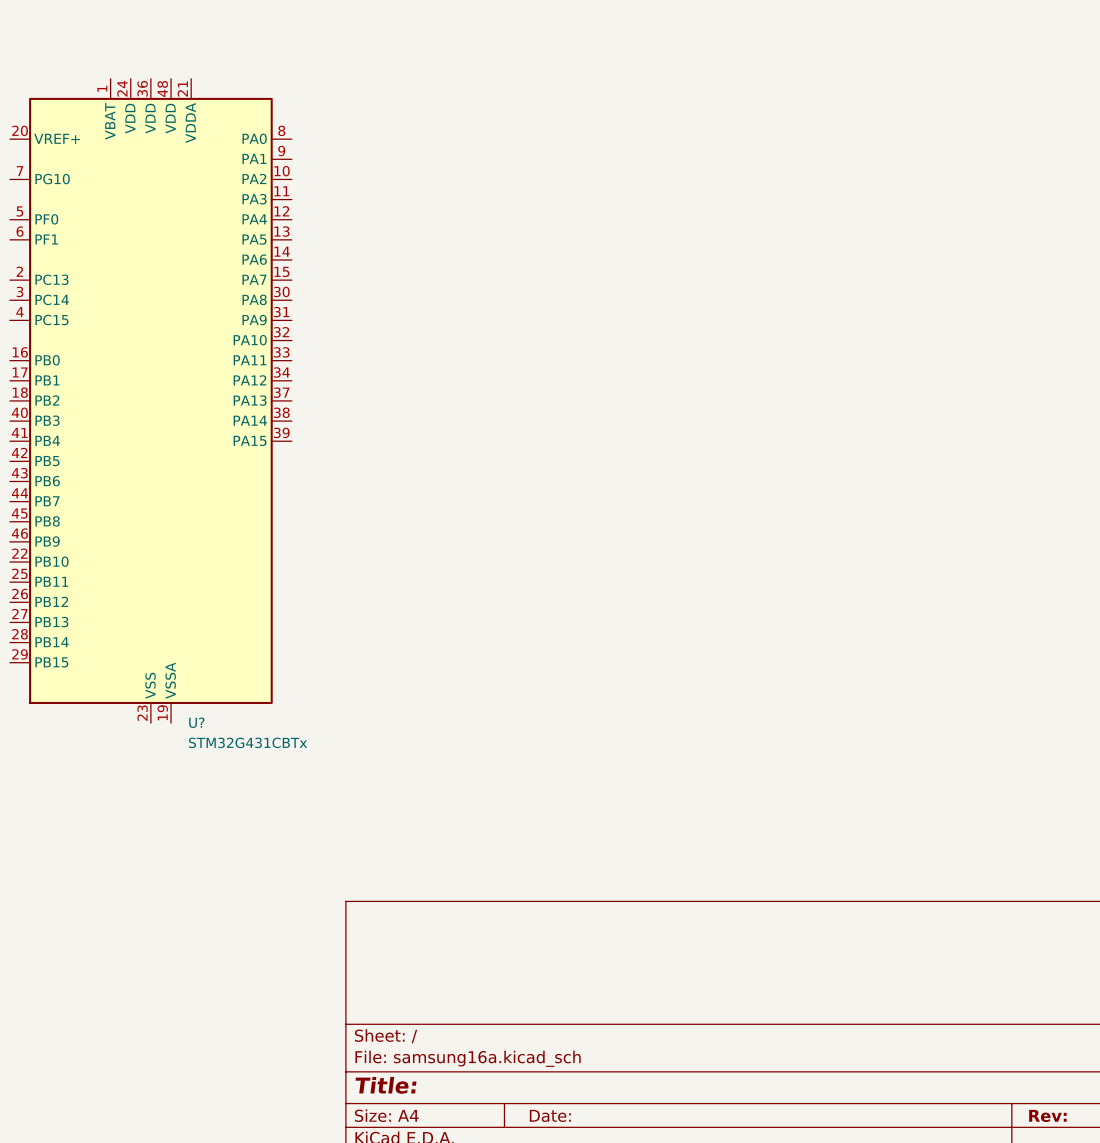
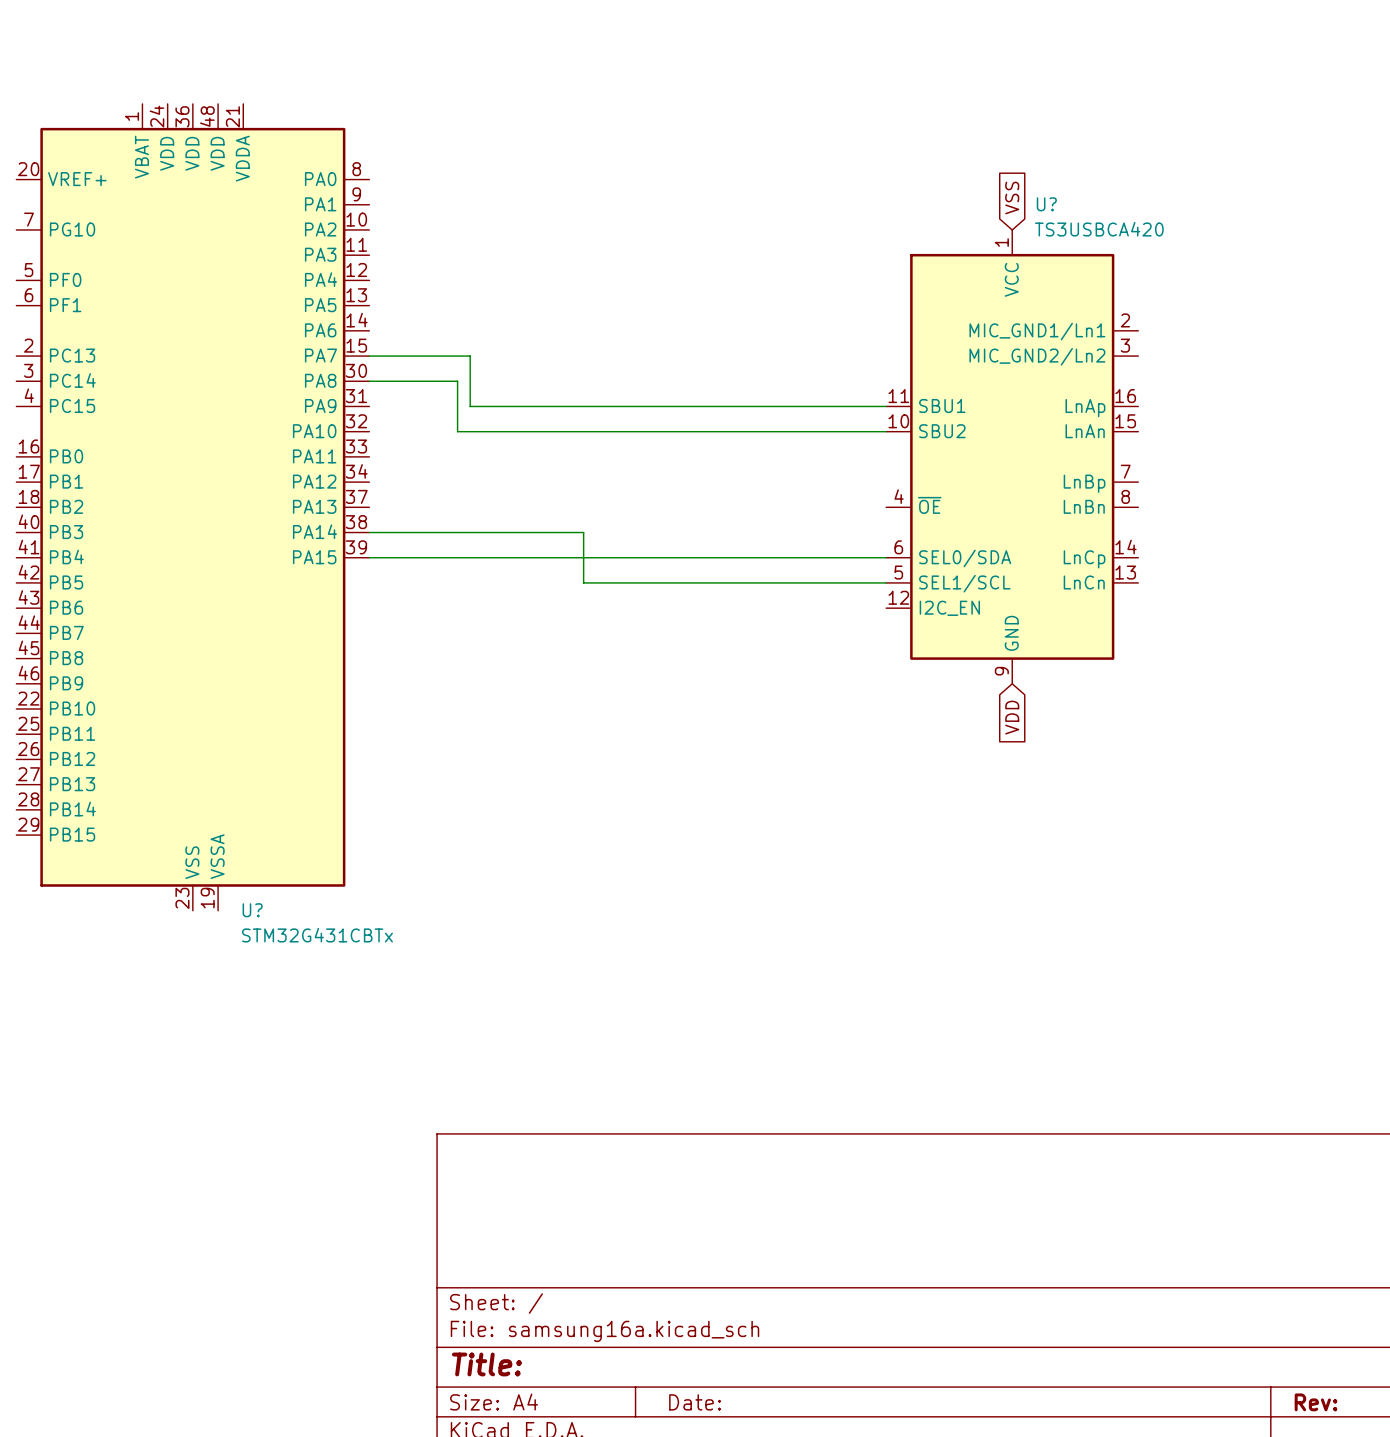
global label: none -> VSS (1012, 198)
wire: none -> (369, 356) (470, 356) (470, 406) (886, 406)
wire: none -> (369, 381) (457, 381) (457, 431) (886, 431)
U?: none -> TS3USBCA420 (1012, 456)
wire: none -> (369, 532) (583, 532) (583, 582) (886, 582)
wire: none -> (369, 557) (886, 557)
global label: none -> VDD (1012, 717)

